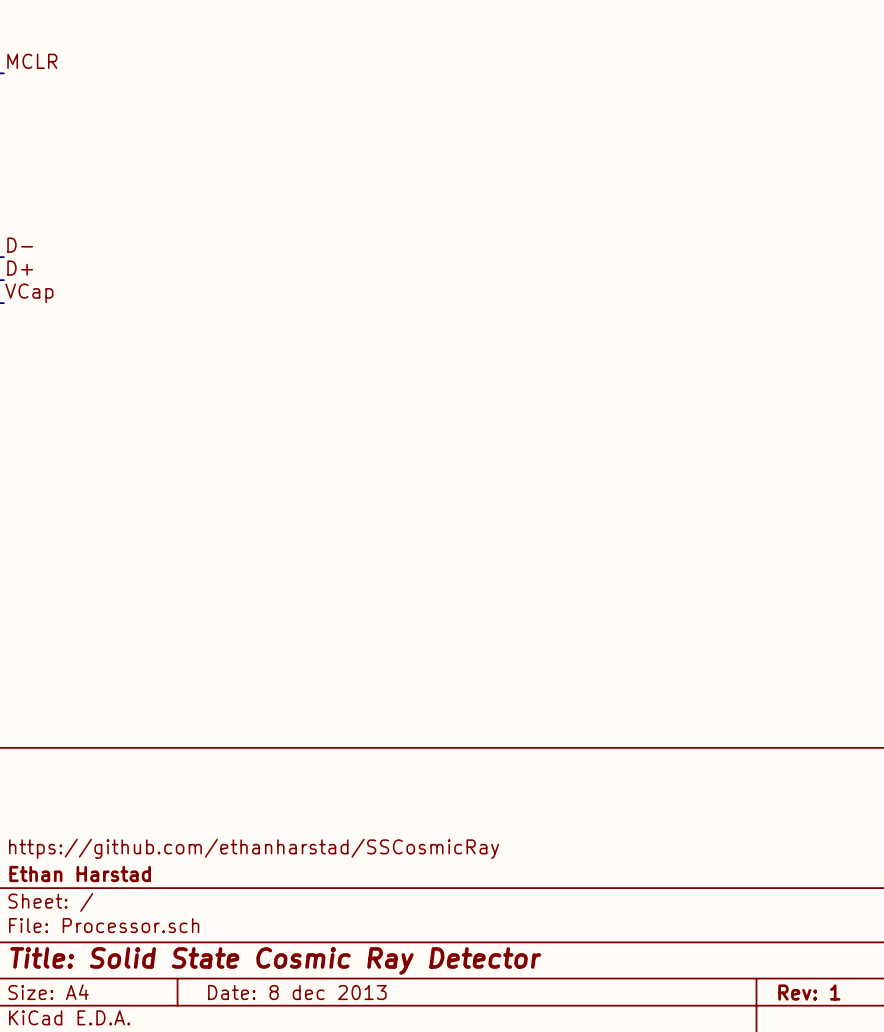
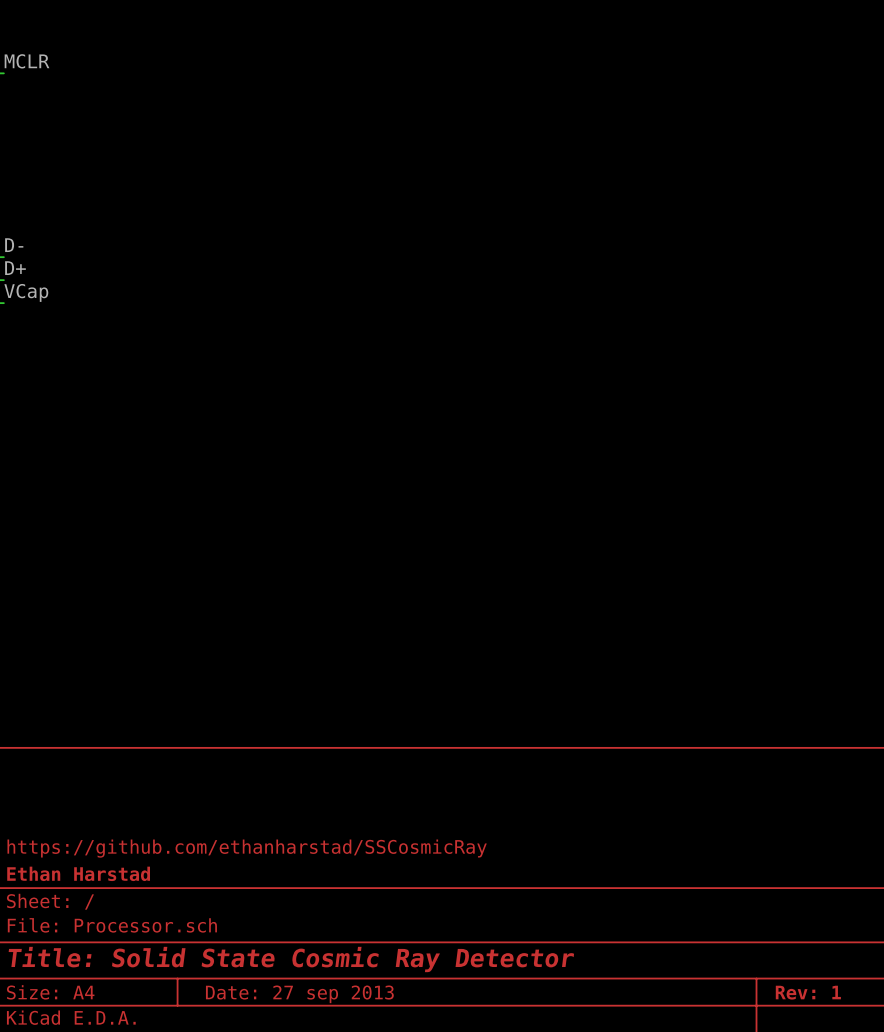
title block: Date: 8 dec 2013 (297, 992) -> Date: 27 sep 2013 (299, 994)

